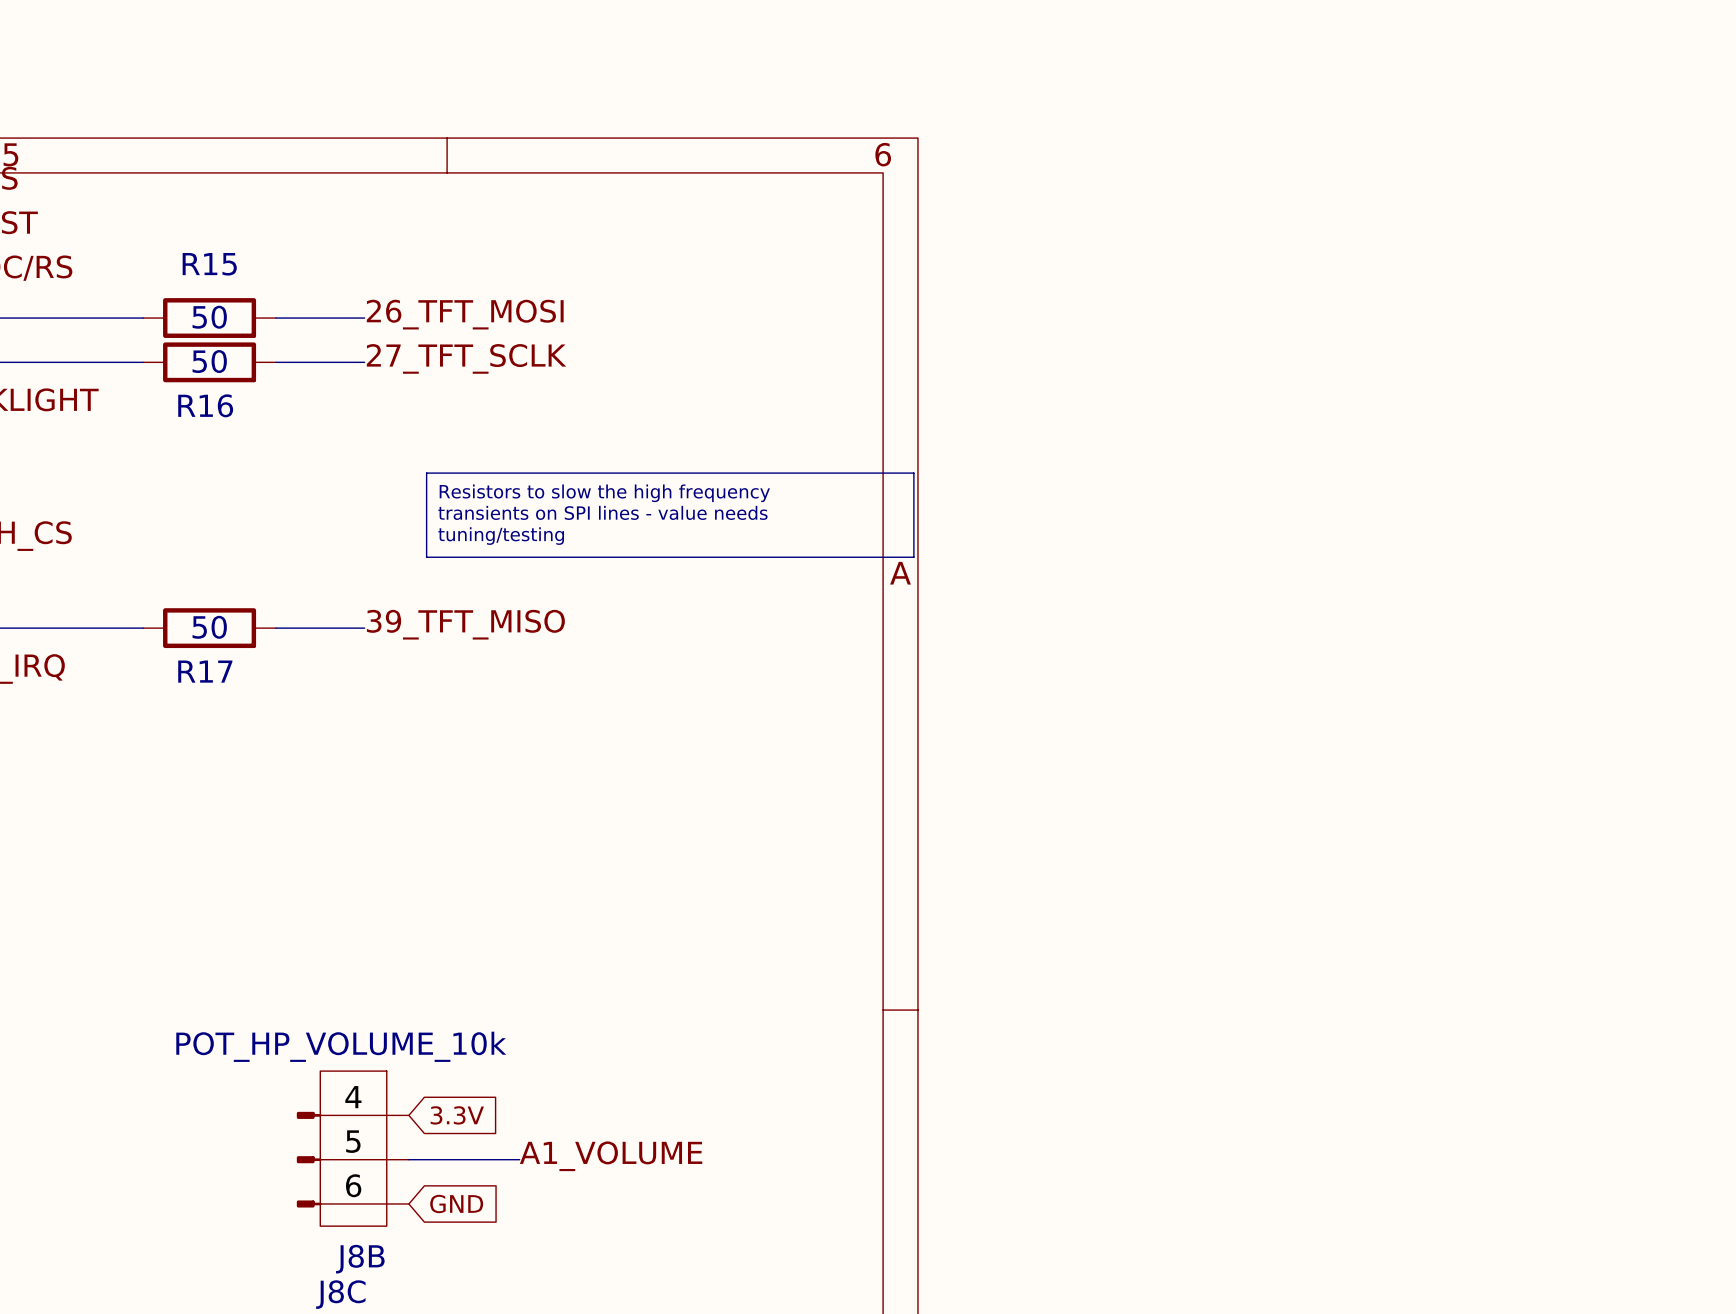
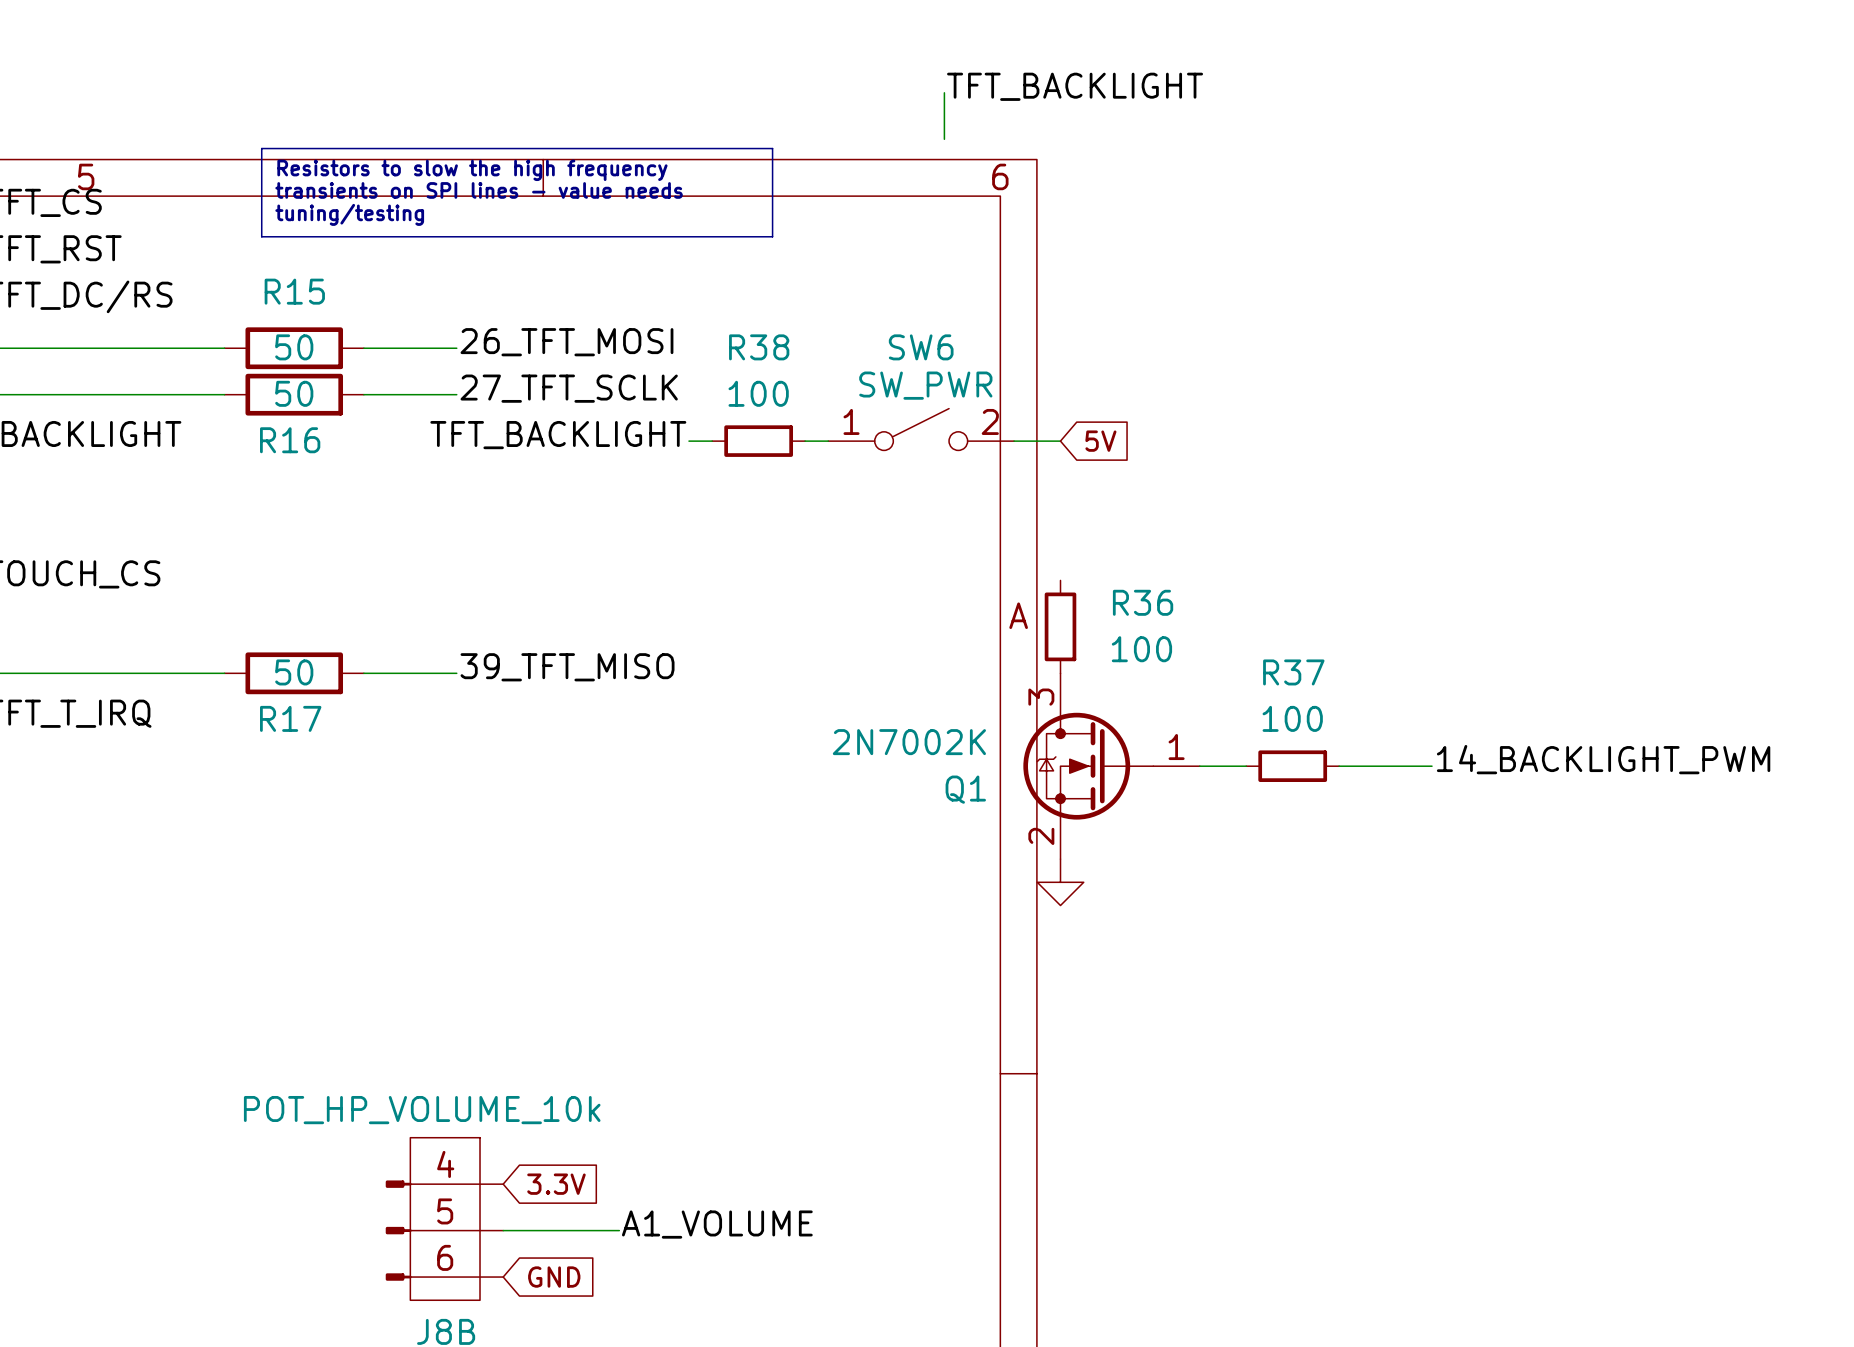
label: none -> TFT_BACKLIGHT (1075, 86)
wire: none -> (944, 92) (944, 139)
SW6: none -> SW_PWR (921, 429)
label: none -> TFT_BACKLIGHT (558, 435)
wire: none -> (688, 441) (712, 441)
R38: none -> 100 (758, 441)
wire: none -> (805, 441) (828, 441)
wire: none -> (1014, 441) (1060, 441)
global label: none -> 5V (1100, 441)
line: (426, 473) (913, 473) (913, 557) (426, 557) (426, 473) -> (261, 148) (772, 148) (772, 236) (261, 236) (261, 148)
text position: Resistors to slow the high frequency (604, 493) -> Resistors to slow the high frequency (472, 170)
text position: transients on SPI lines - value needs (602, 512) -> transients on SPI lines - value needs (479, 190)
text position: tuning/testing (501, 536) -> tuning/testing (349, 214)
R36: none -> 100 (1060, 626)
label: none -> 14_BACKLIGHT_PWM (1603, 759)
Q1: none -> 2N7002K (1111, 766)
wire: none -> (1199, 766) (1246, 766)
R37: none -> 100 (1292, 766)
wire: none -> (1339, 766) (1432, 766)
power symbol: none -> (1060, 882)

